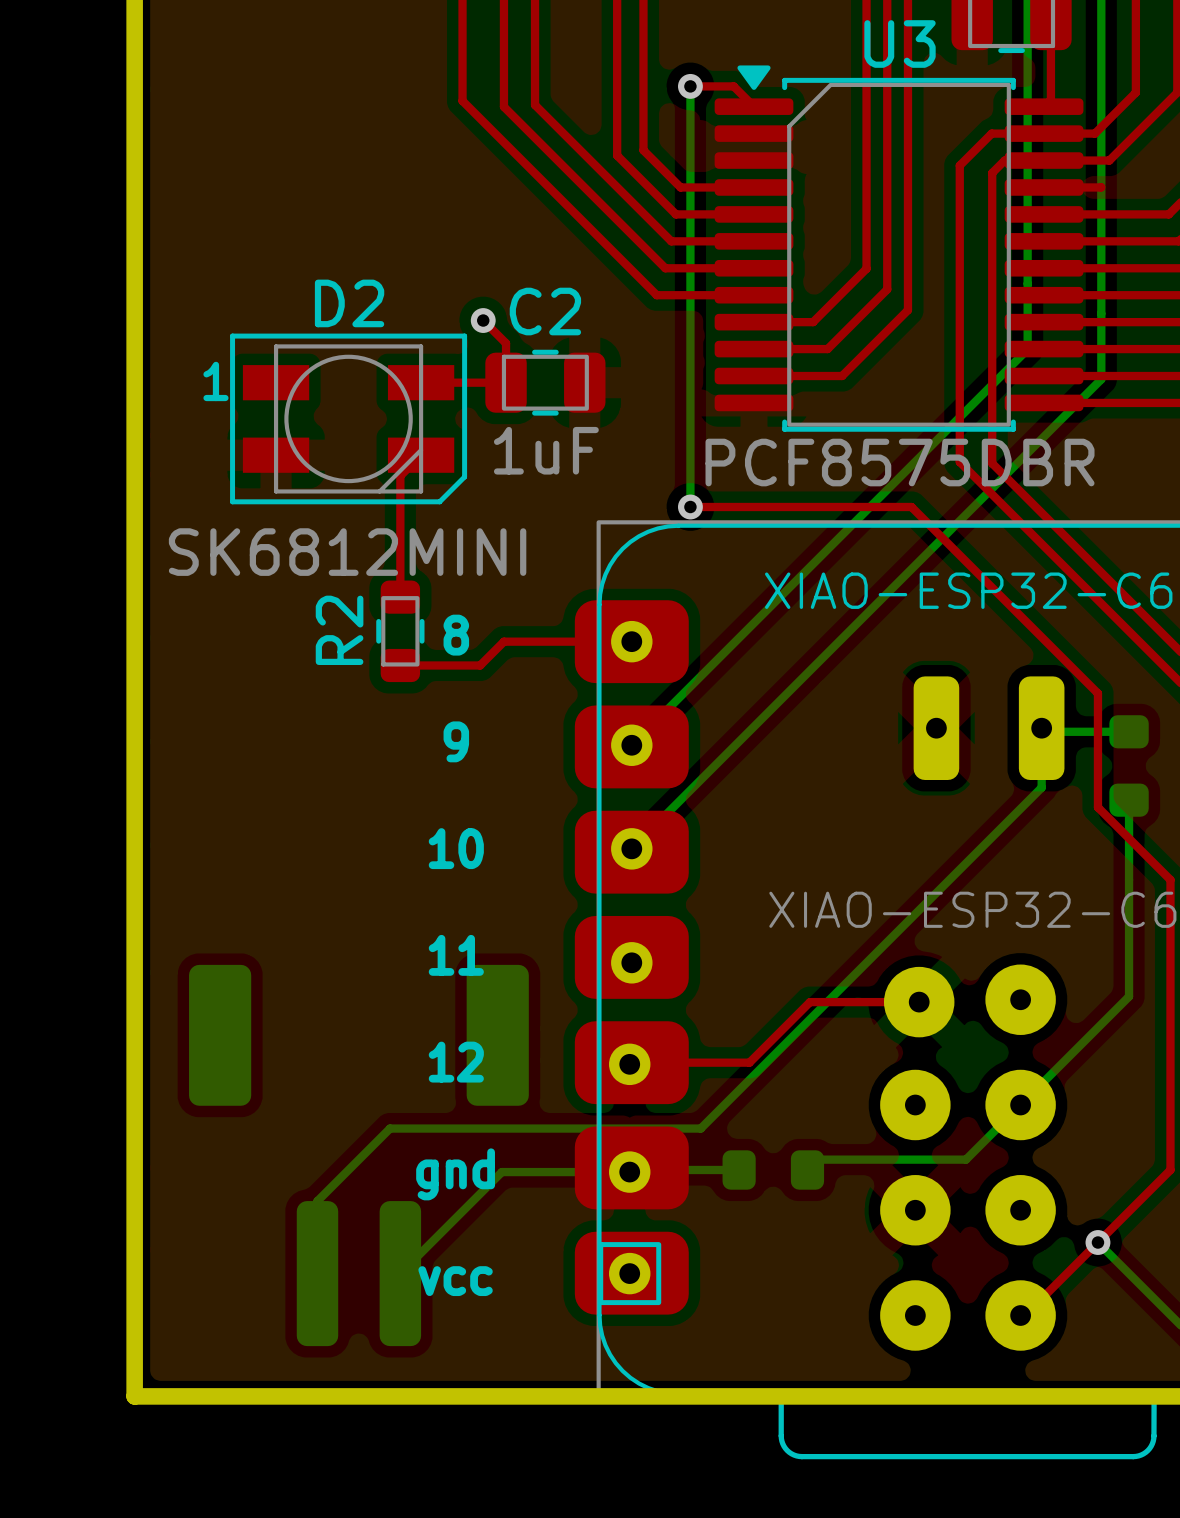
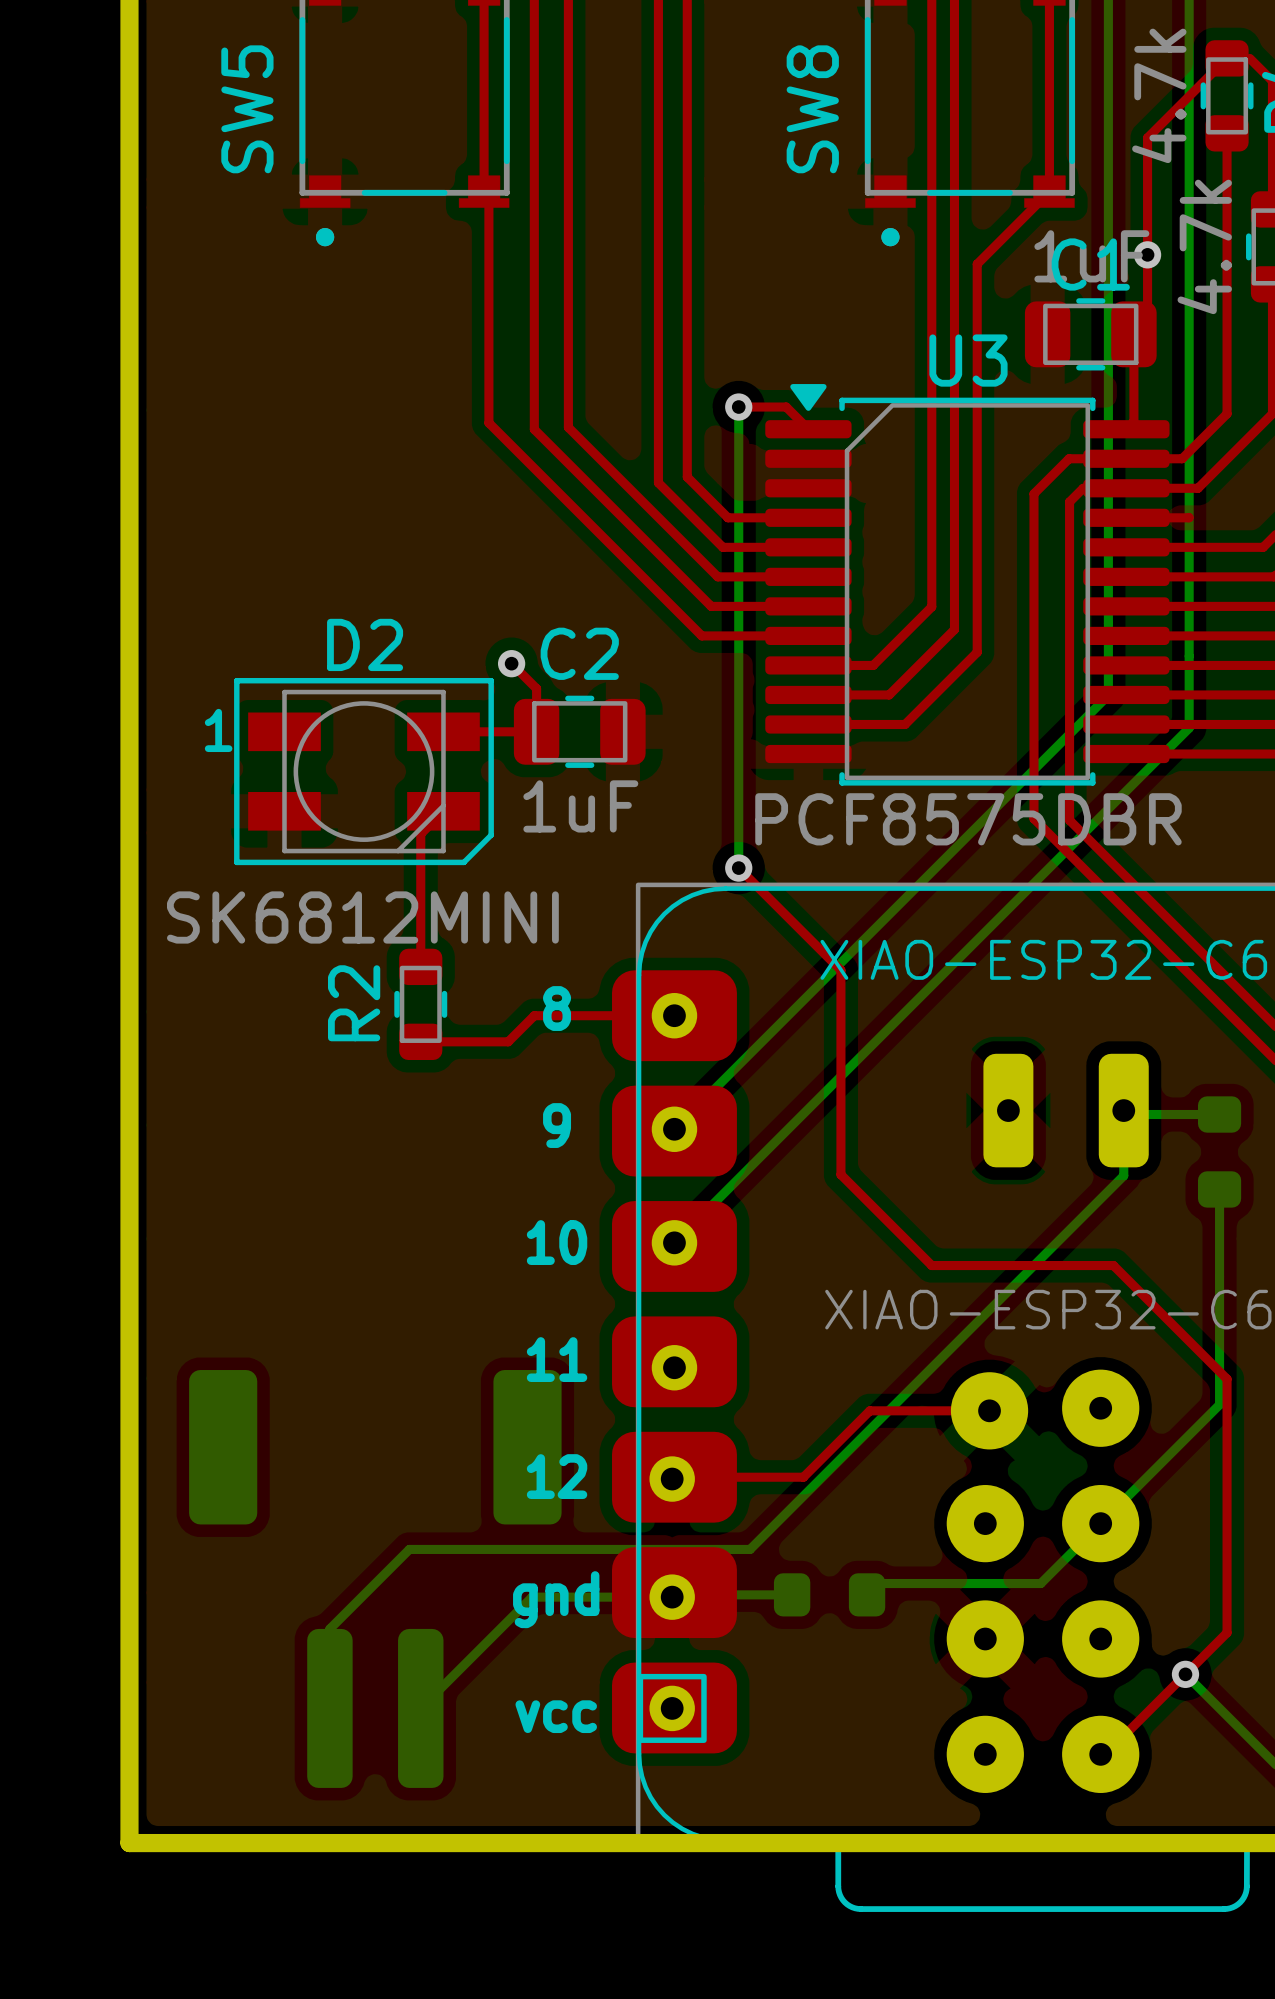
top track: (690, 506) (911, 506) (1097, 693) (1097, 807) (1170, 879) (1170, 1169) (1135, 1204) -> (738, 868) (840, 970) (840, 1174) (931, 1265) (1113, 1265) (1227, 1379) (1227, 1632)
text position: 8 (456, 635) -> 8 (557, 1008)
text position: 9 (456, 741) -> 9 (557, 1125)
text position: 10 (456, 848) -> 10 (557, 1242)
text position: 11 (456, 955) -> 11 (557, 1359)
text position: 12 (456, 1062) -> 12 (557, 1476)
text position: gnd (455, 1174) -> gnd (556, 1599)
text position: vcc (455, 1281) -> vcc (556, 1716)

